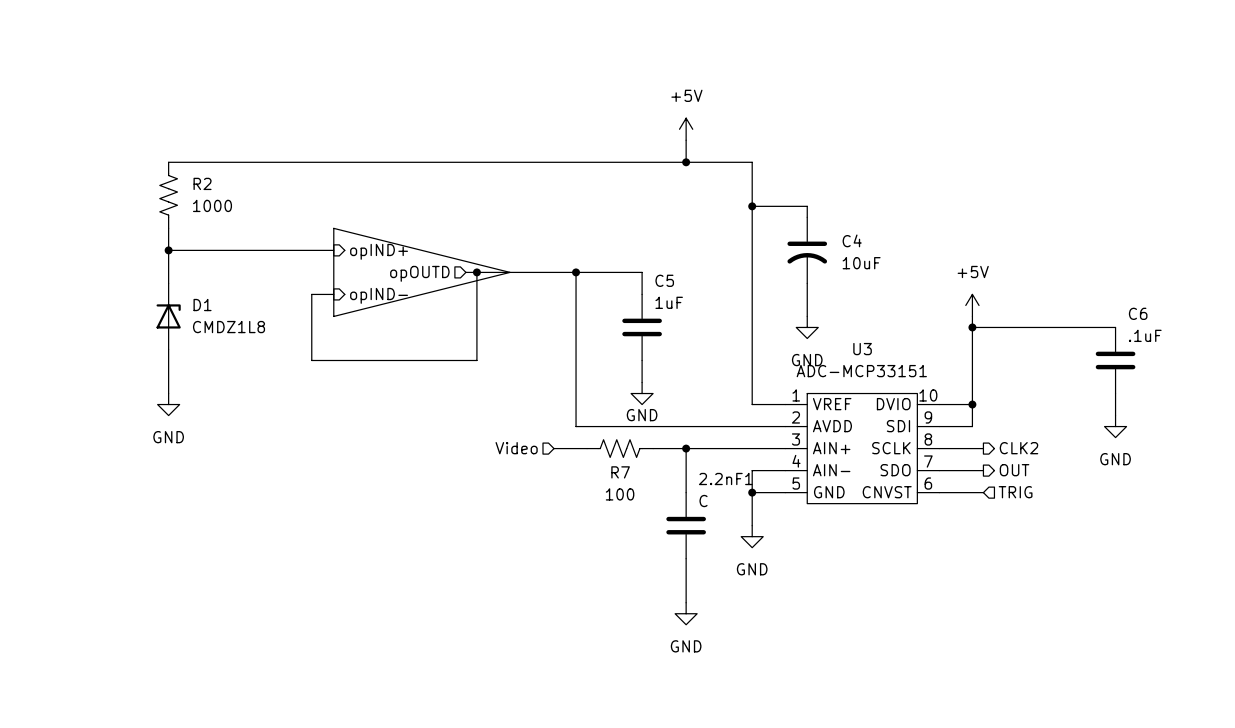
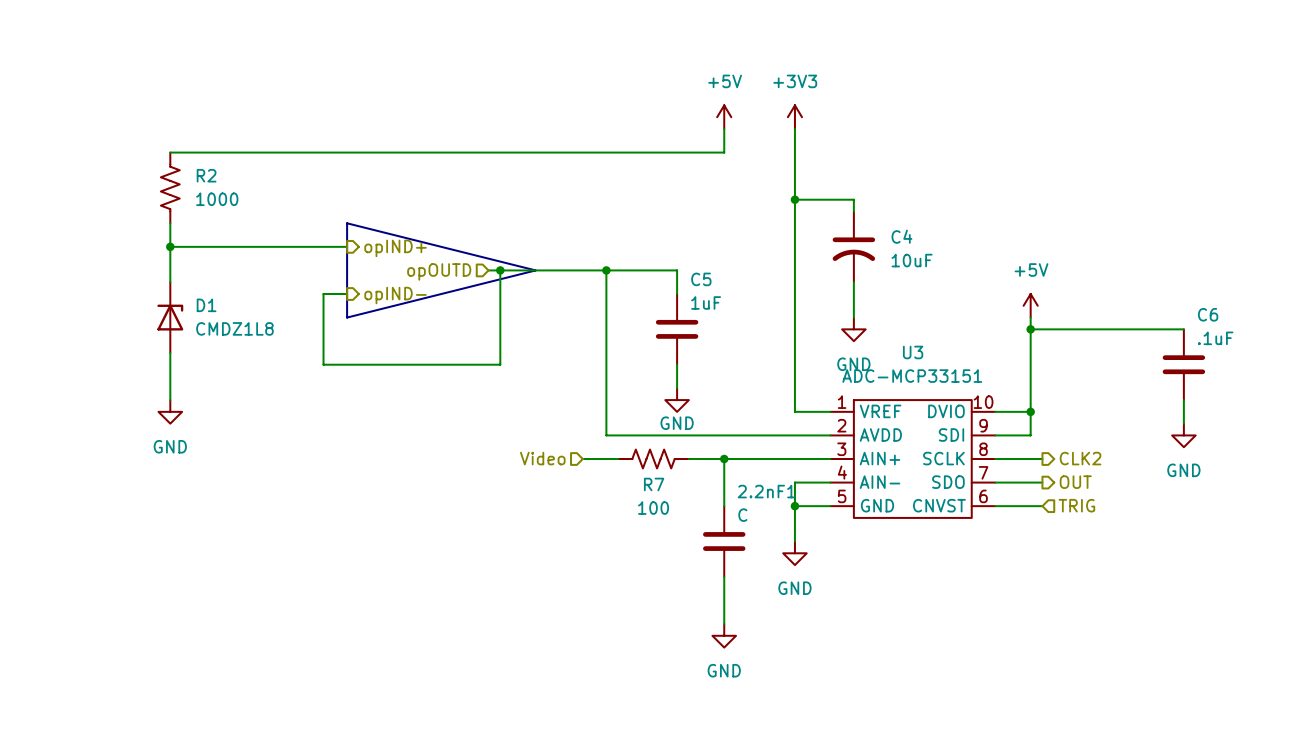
power symbol: none -> +3V3 (794, 117)
wire: (686, 162) (752, 162) -> (794, 129) (794, 152)
junction: (686, 162) -> none

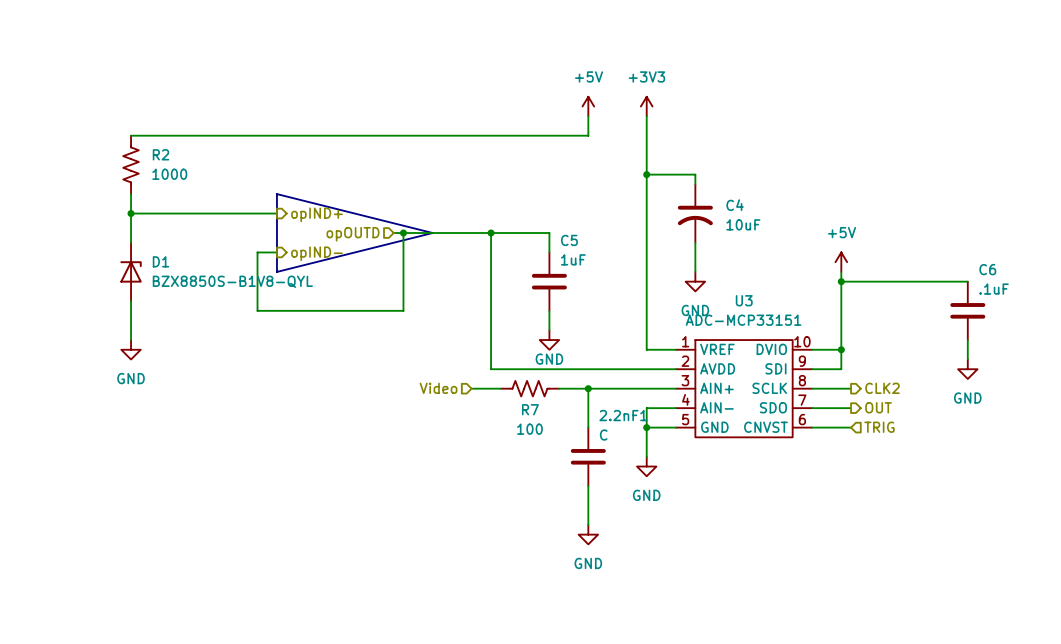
D1 value: CMDZ1L8 (234, 328) -> BZX8850S-B1V8-QYL (232, 281)

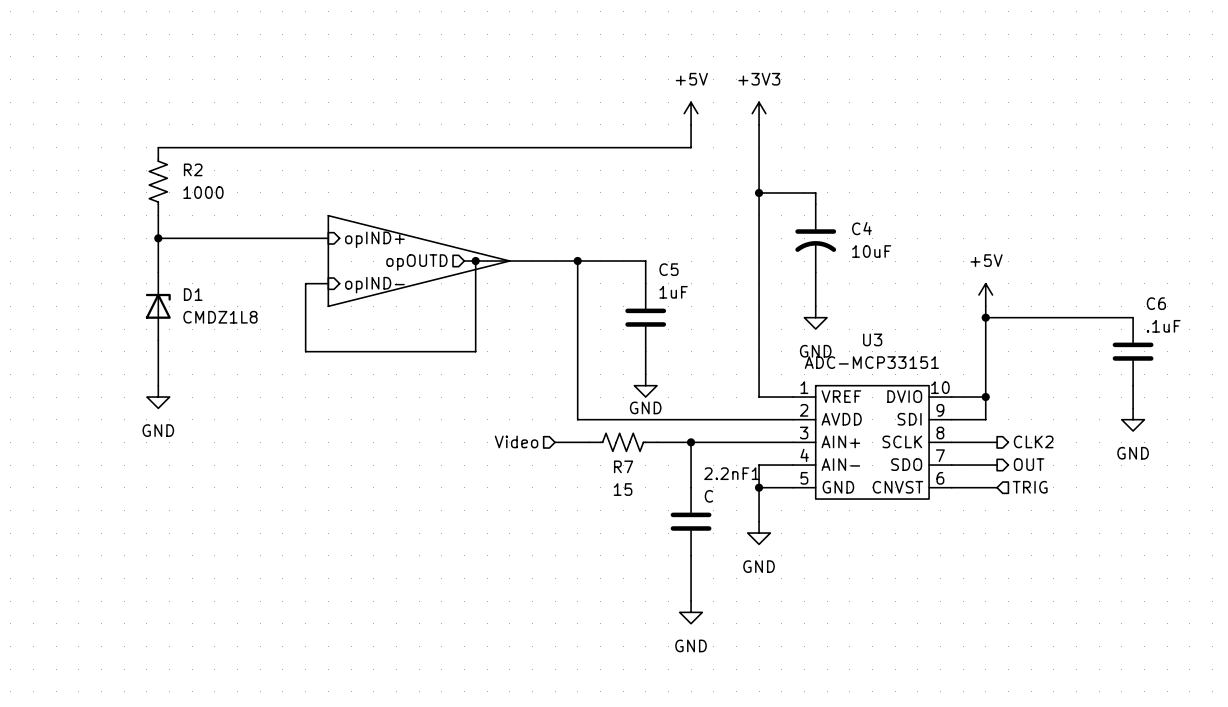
D1 value: BZX8850S-B1V8-QYL (232, 281) -> CMDZ1L8 (220, 317)
R7 value: 100 (529, 429) -> 15 (623, 489)

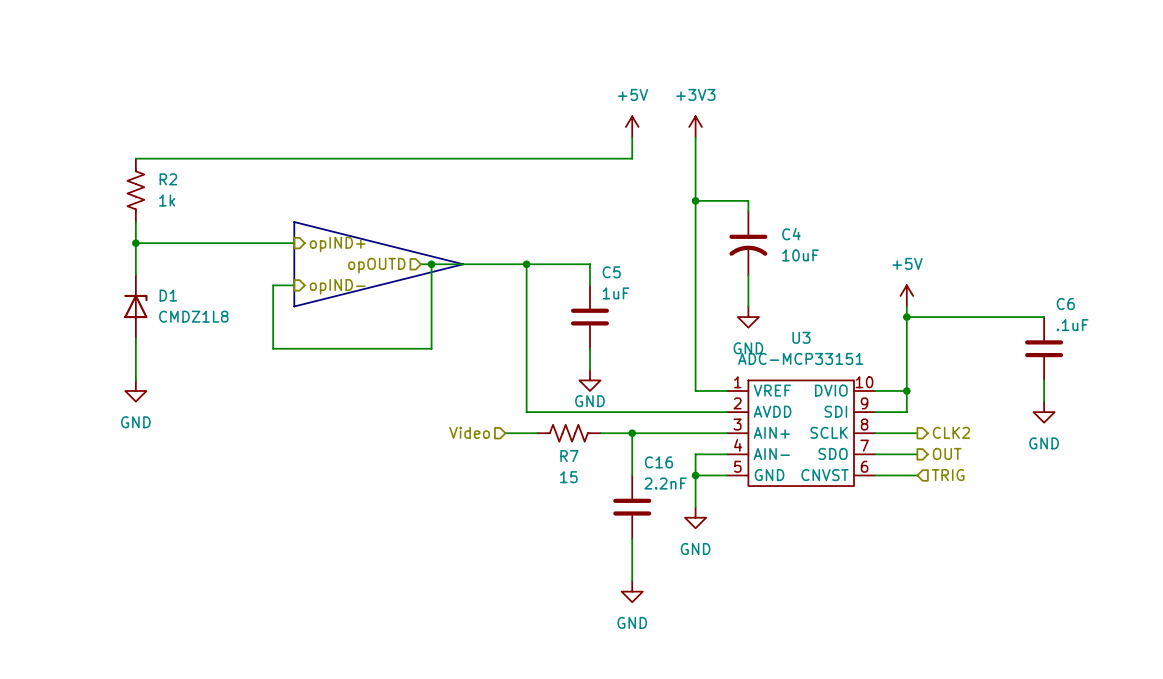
R2 value: 1000 (203, 192) -> 1k (167, 200)
2.2nF1 name: 2.2nF1 (731, 473) -> C16 (658, 462)
2.2nF1 value: C (708, 496) -> 2.2nF (665, 483)

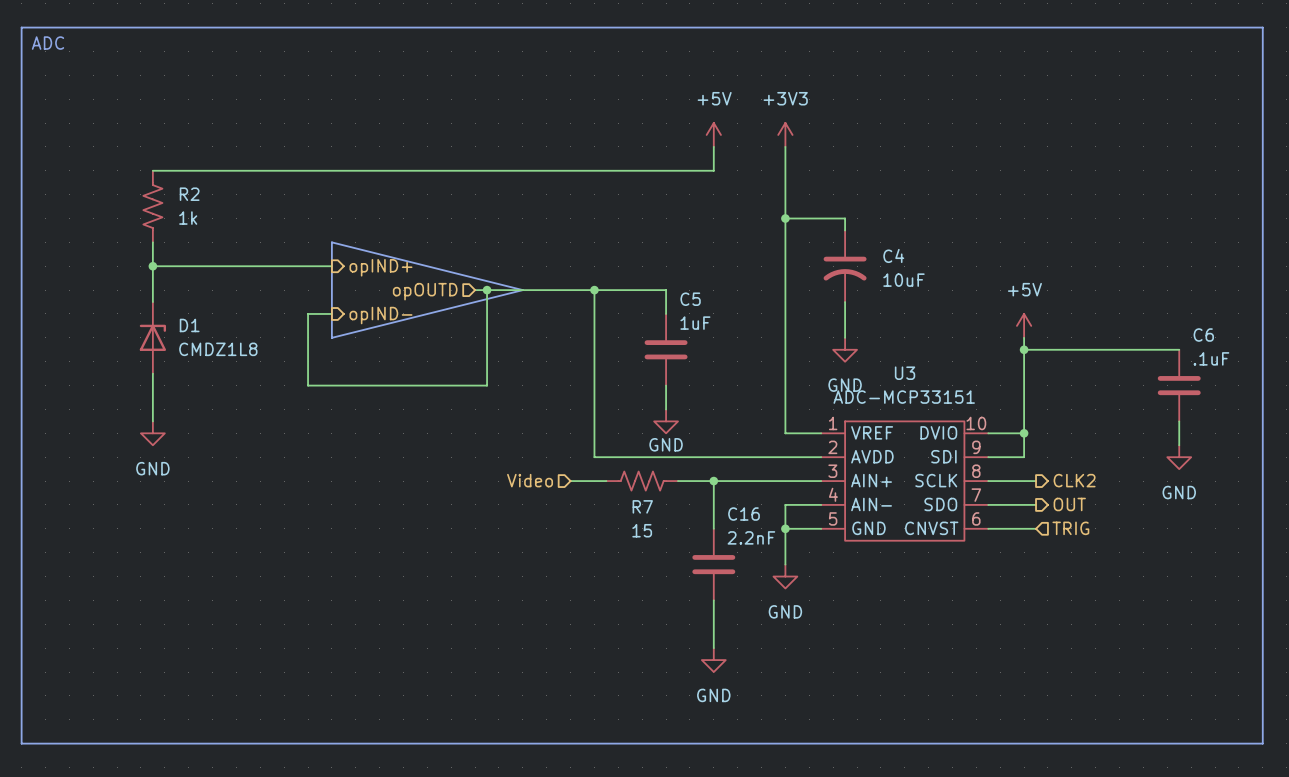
line: none -> (21, 27) (1262, 27) (1262, 743) (21, 743) (21, 27)
text: none -> ADC (47, 43)

